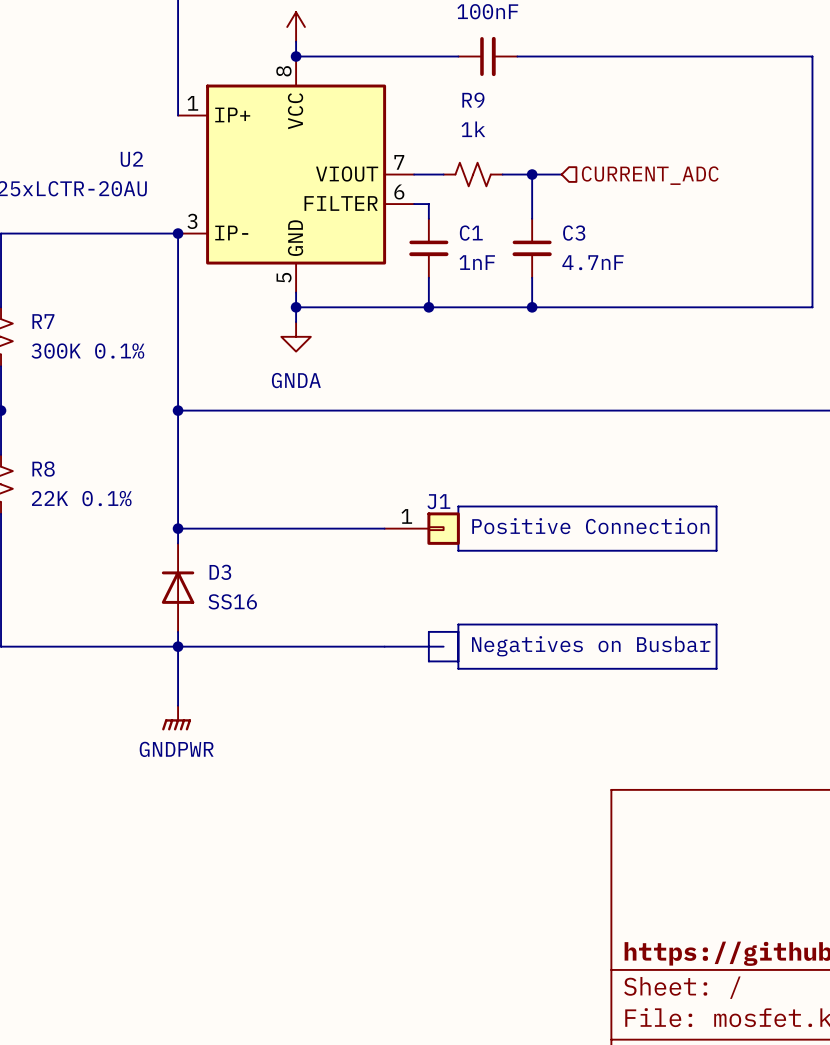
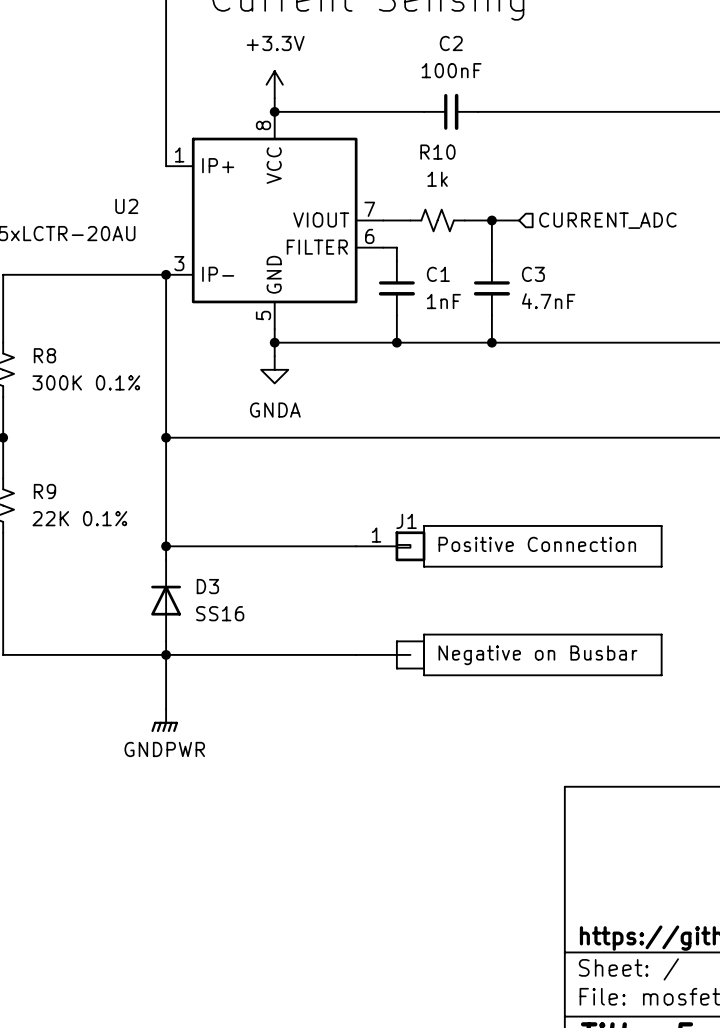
R9 name: R9 (473, 100) -> R10 (437, 152)
R7 name: R7 (43, 321) -> R8 (44, 355)
R8 name: R8 (43, 469) -> R9 (44, 491)
text: Negatives on Busbar (591, 646) -> Negative on Busbar (537, 655)

